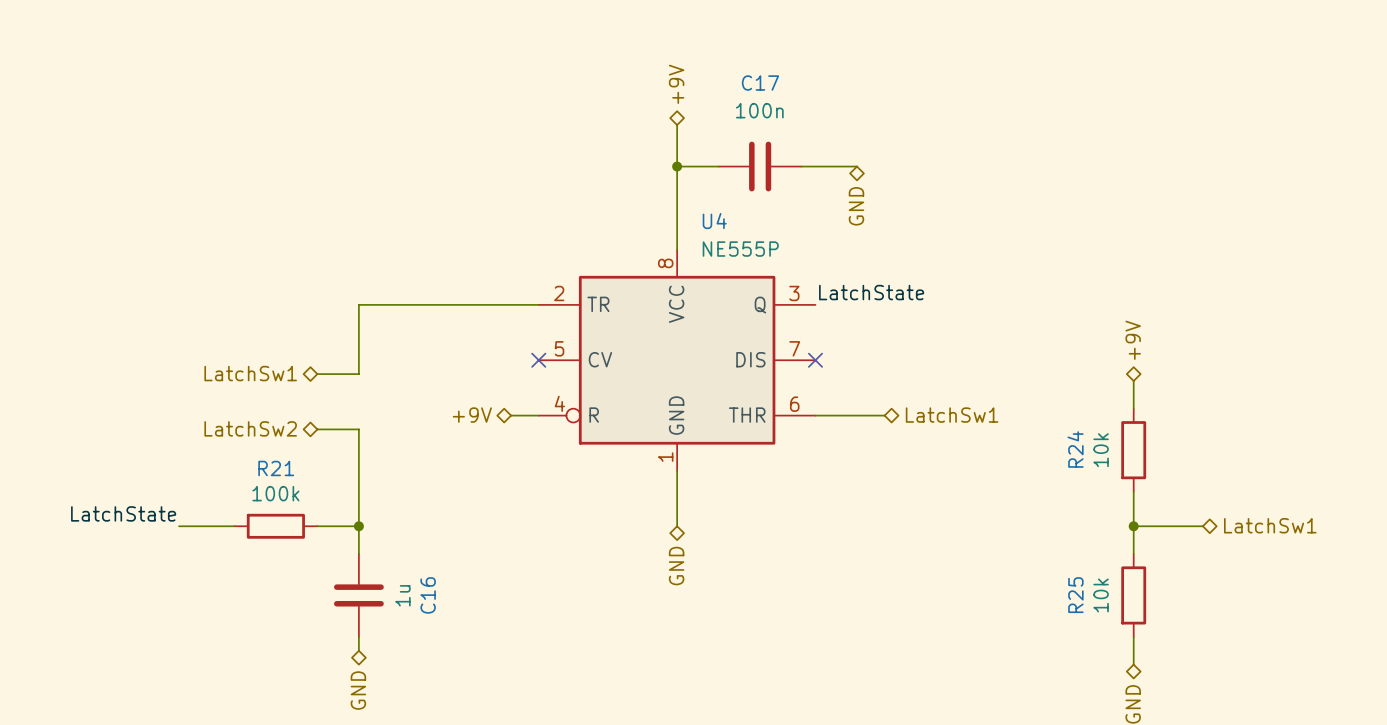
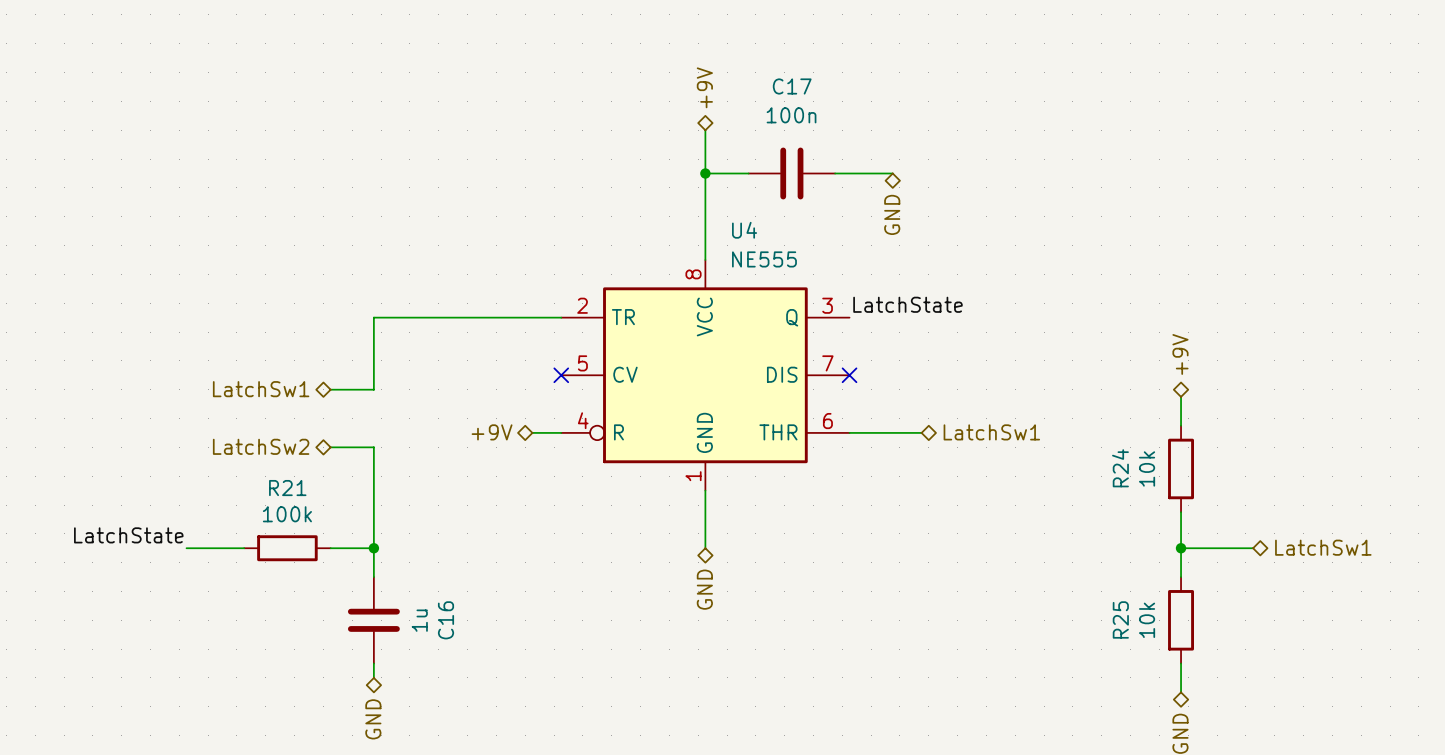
U4 value: NE555P (740, 249) -> NE555 (764, 259)

